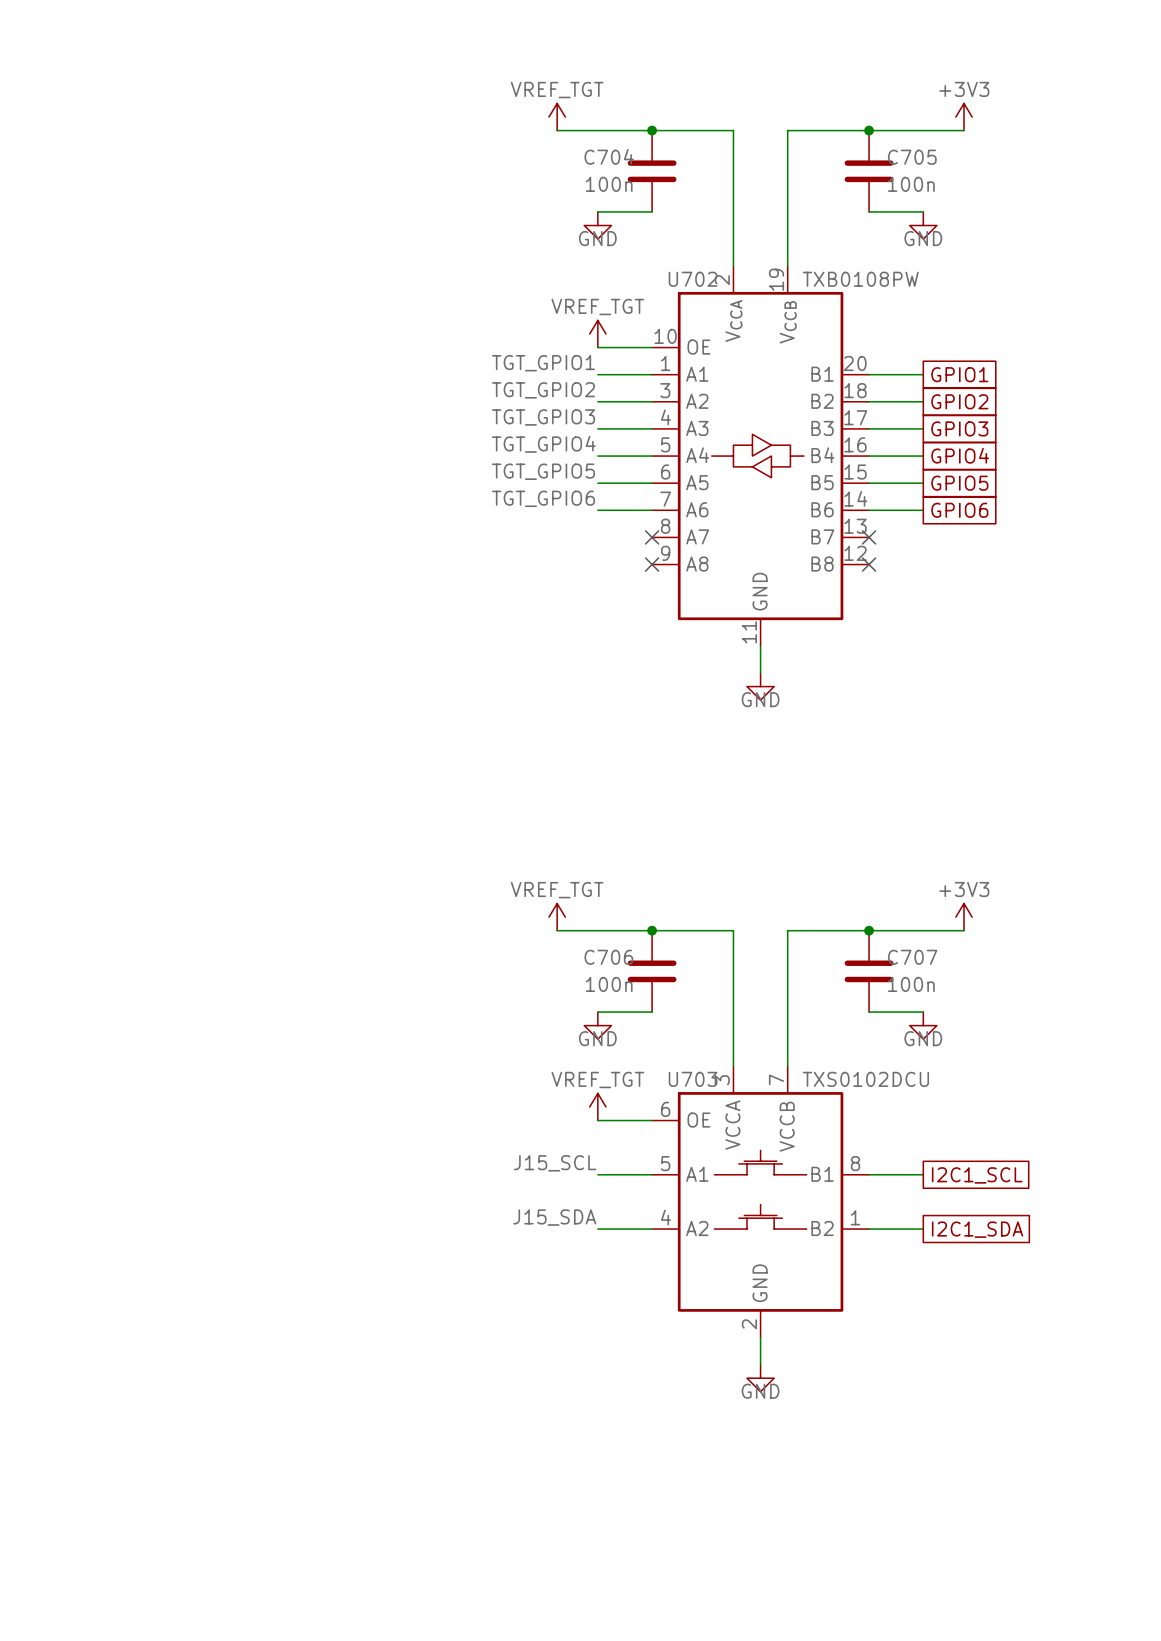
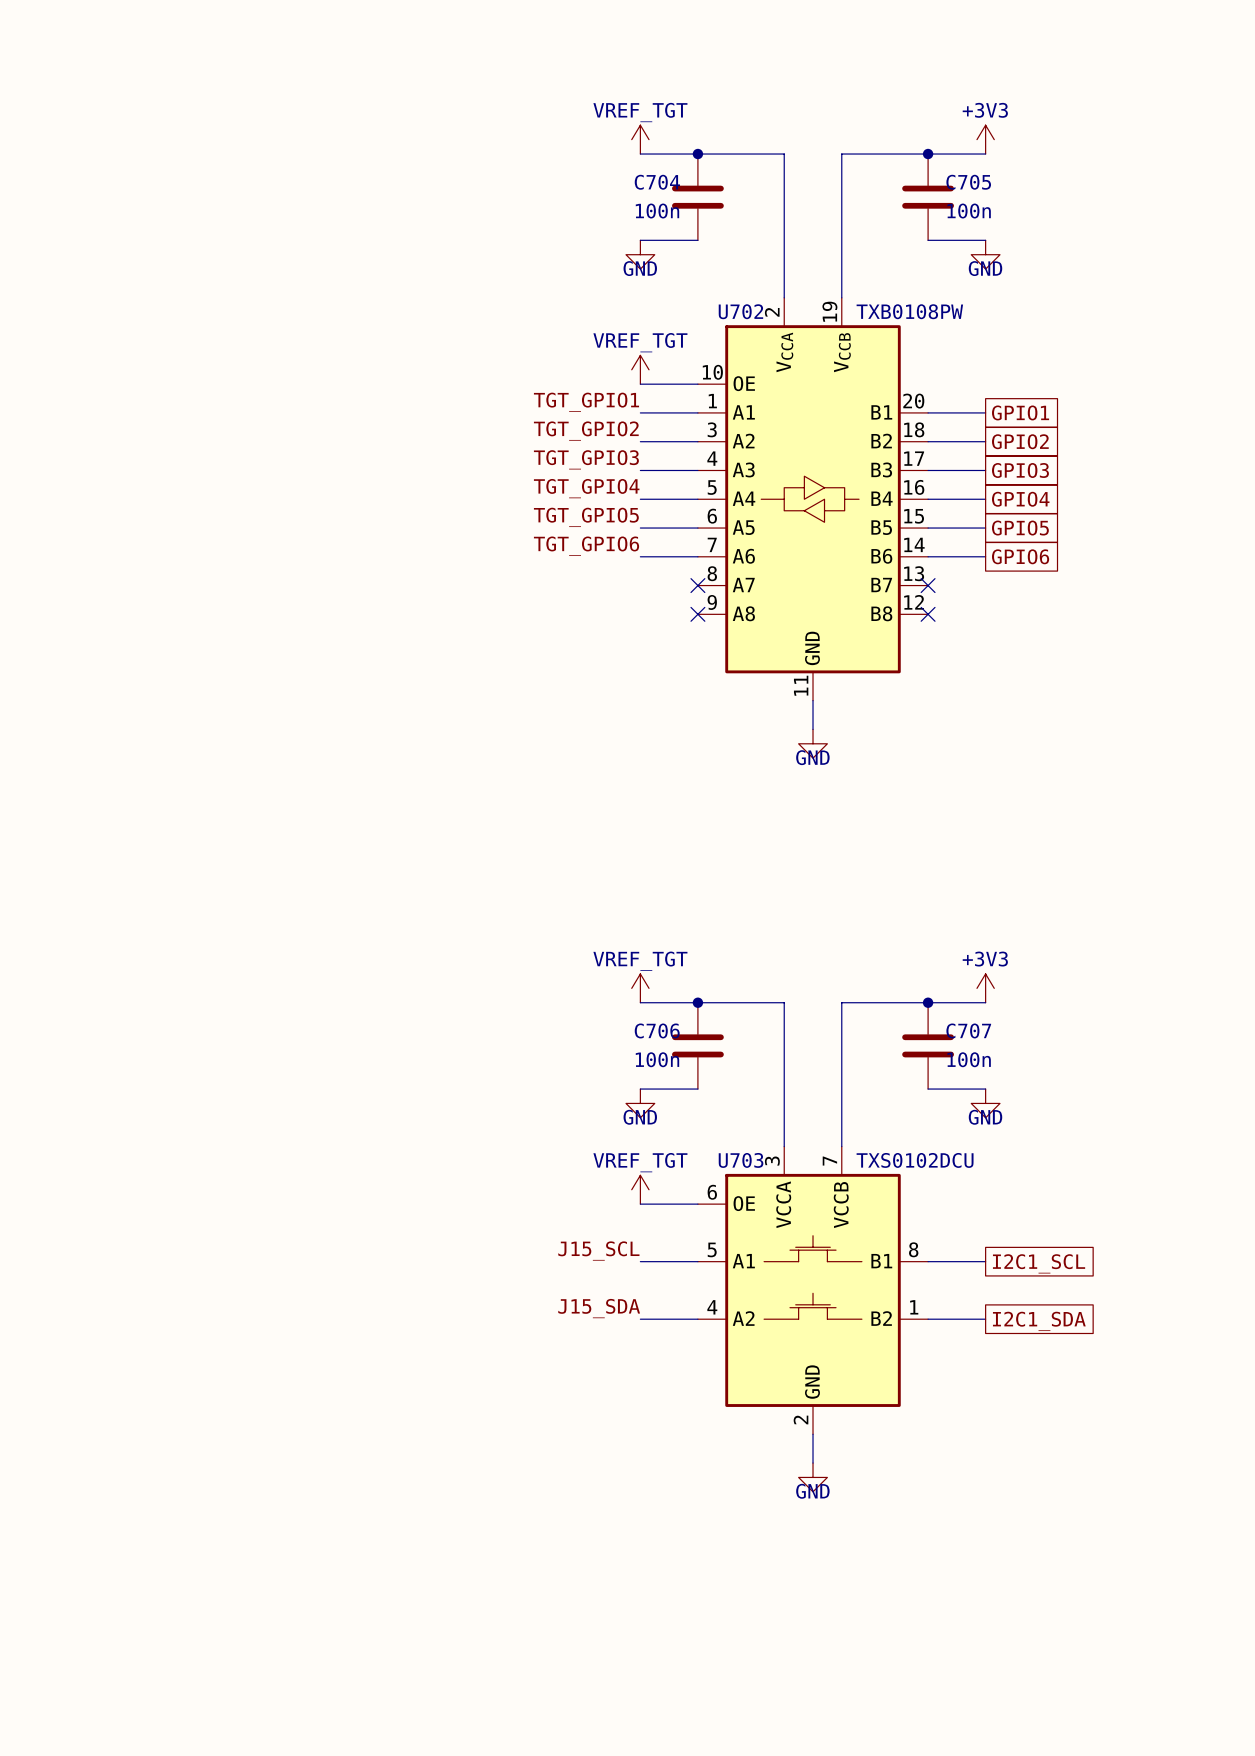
power symbol position: VREF_TGT (557, 117) -> VREF_TGT (640, 139)
power symbol position: +3V3 (963, 117) -> +3V3 (985, 139)
wire: (557, 130) (597, 130) -> none
wire: (923, 130) (963, 130) -> none
power symbol position: VREF_TGT (557, 917) -> VREF_TGT (640, 988)
power symbol position: +3V3 (963, 917) -> +3V3 (985, 988)
wire: (557, 930) (597, 930) -> none
wire: (923, 930) (963, 930) -> none

